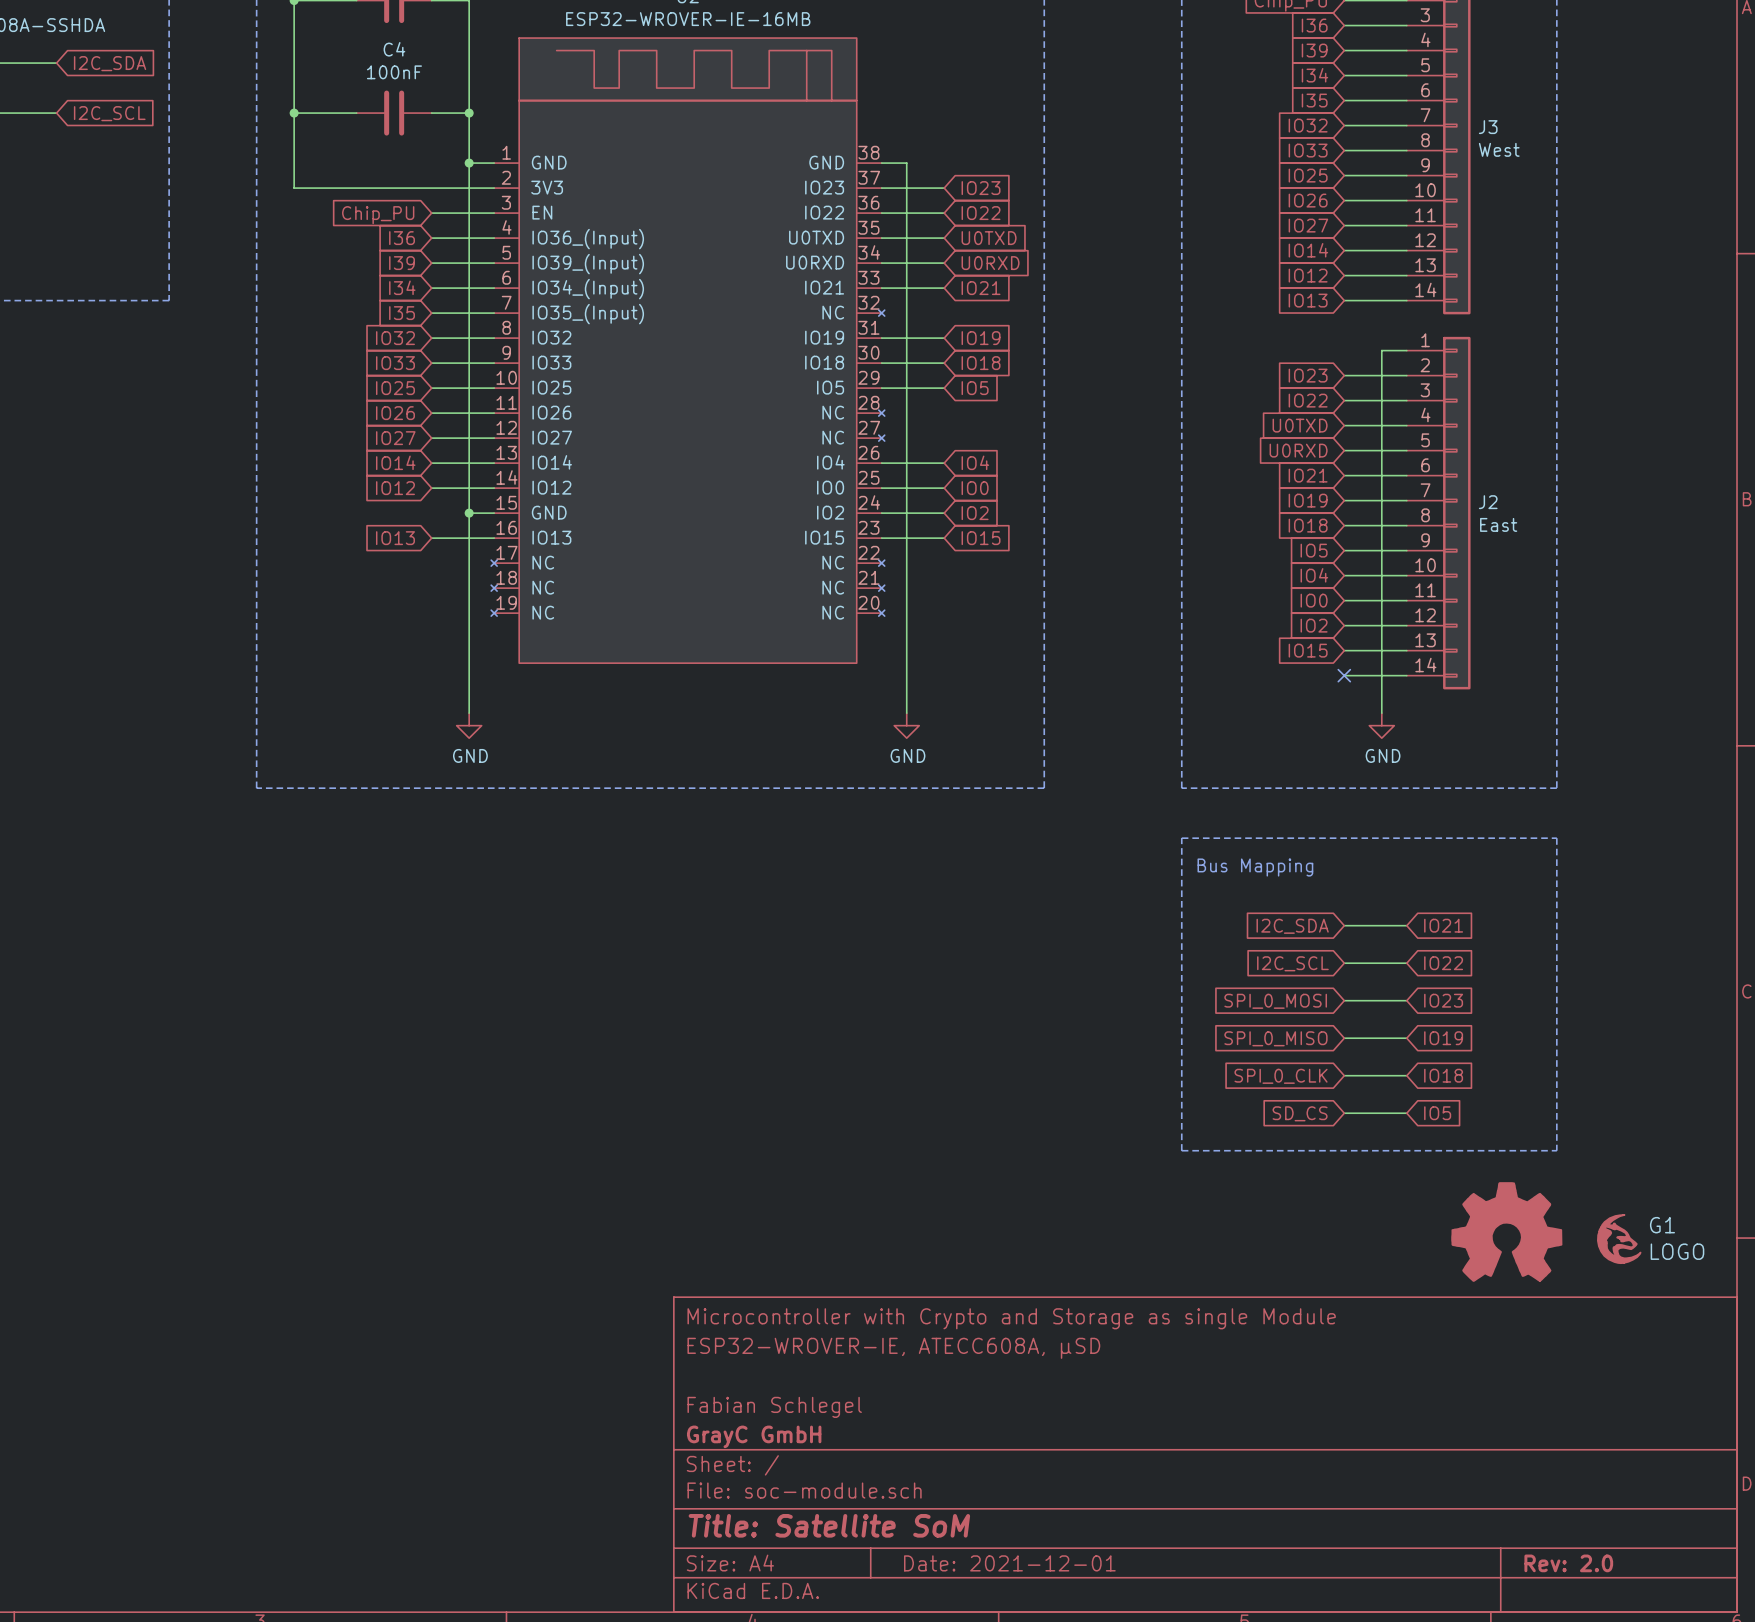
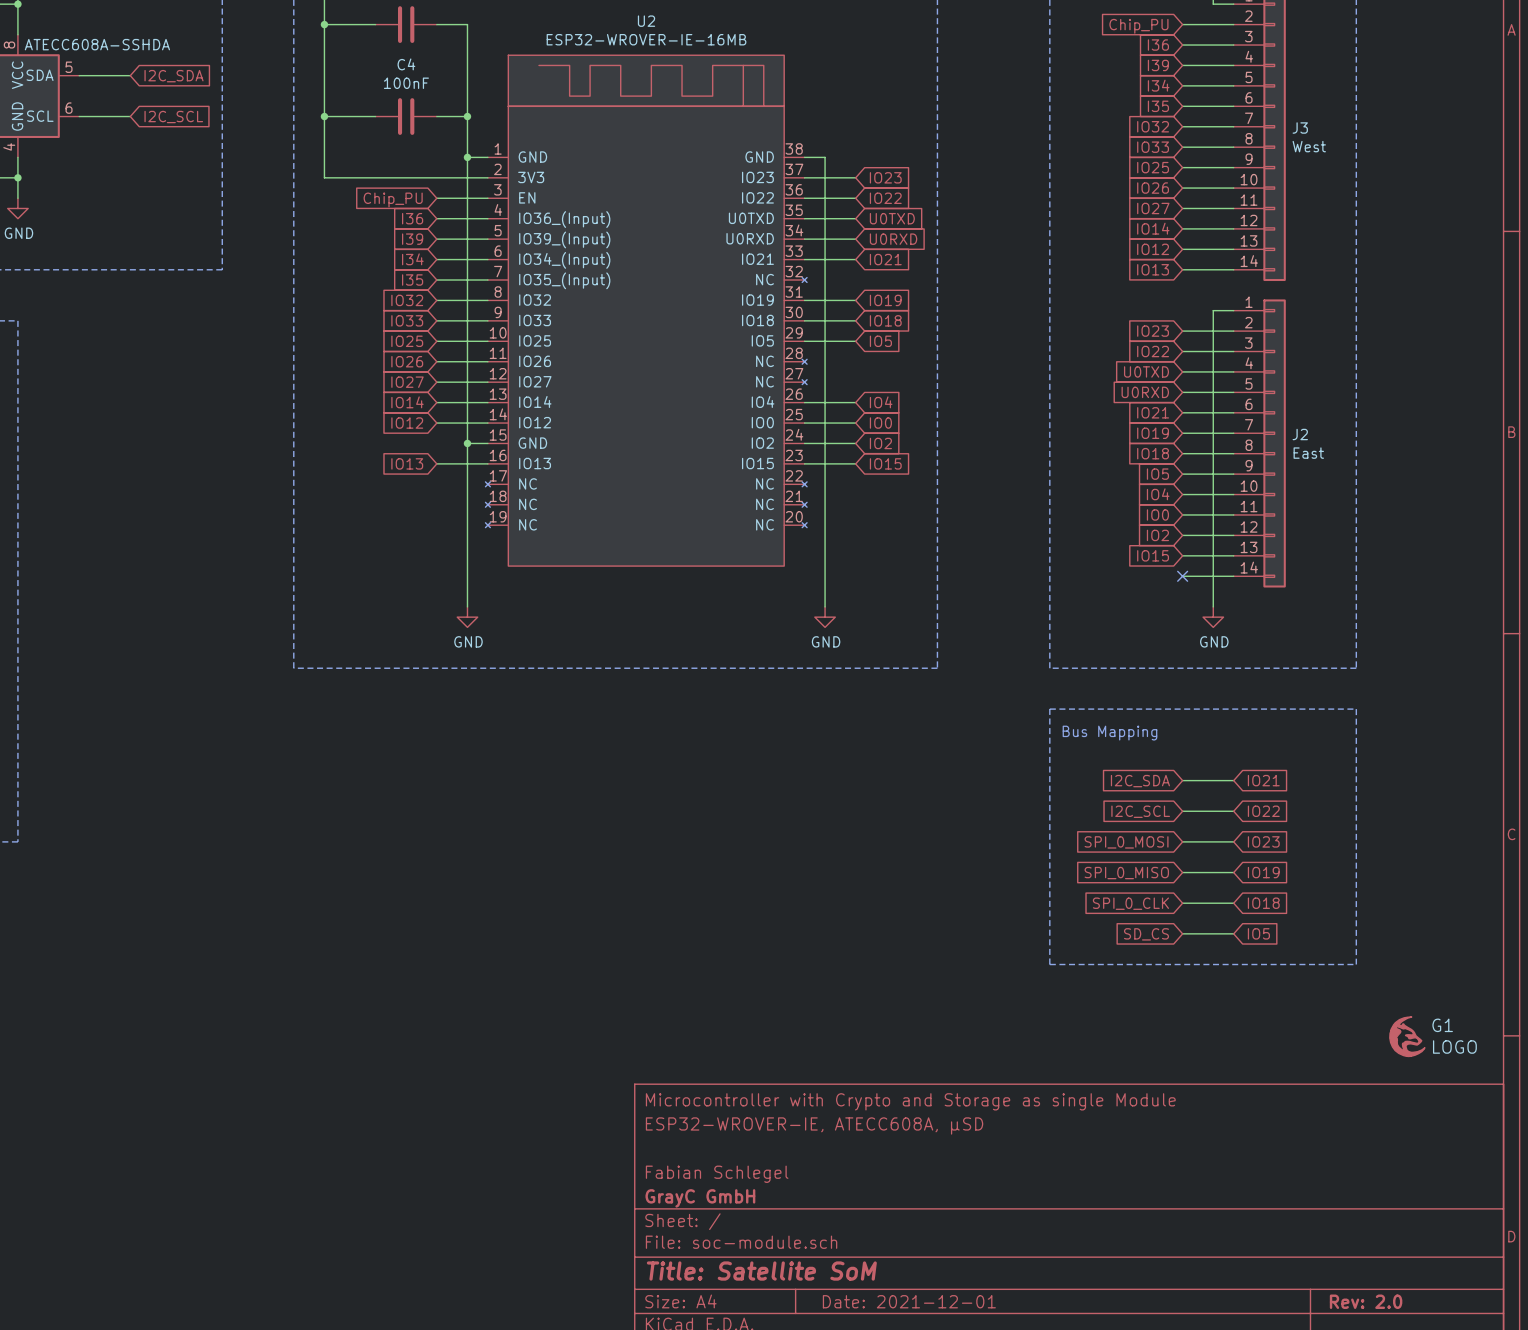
part: (1506, 1231) -> none

